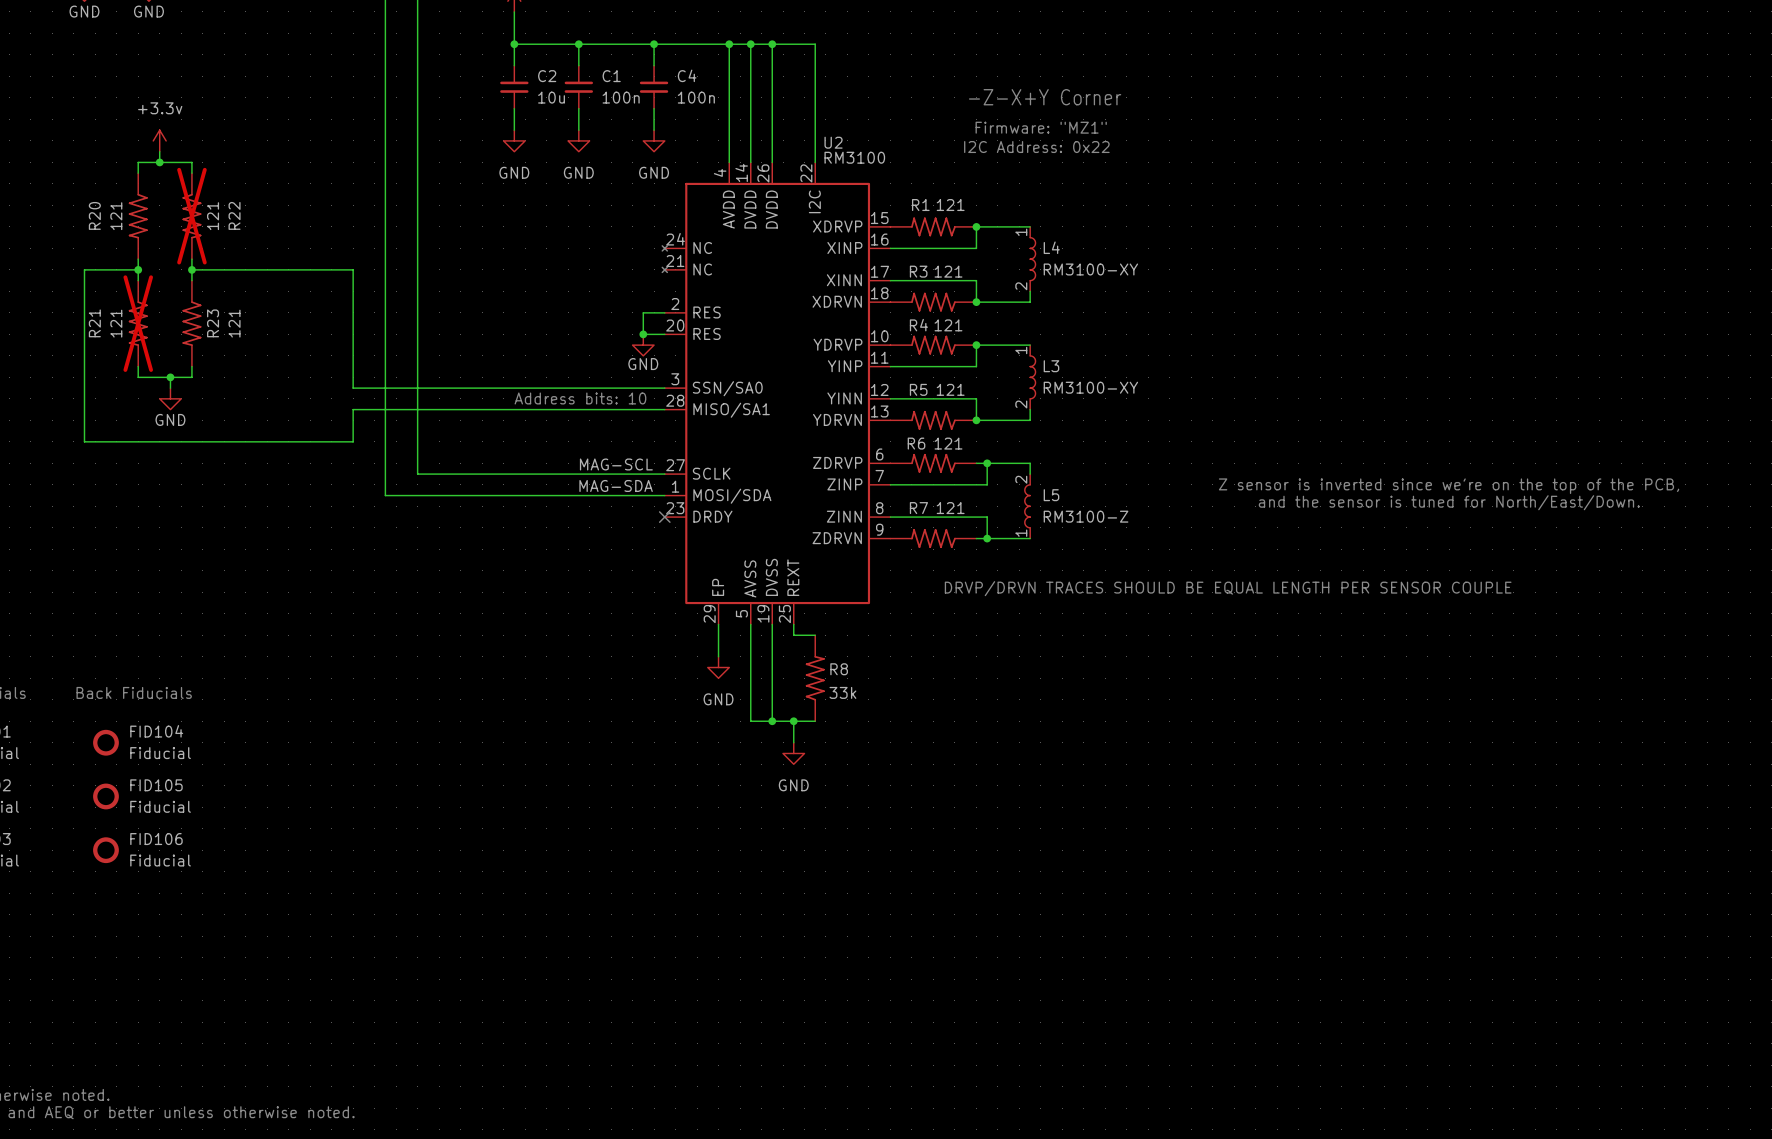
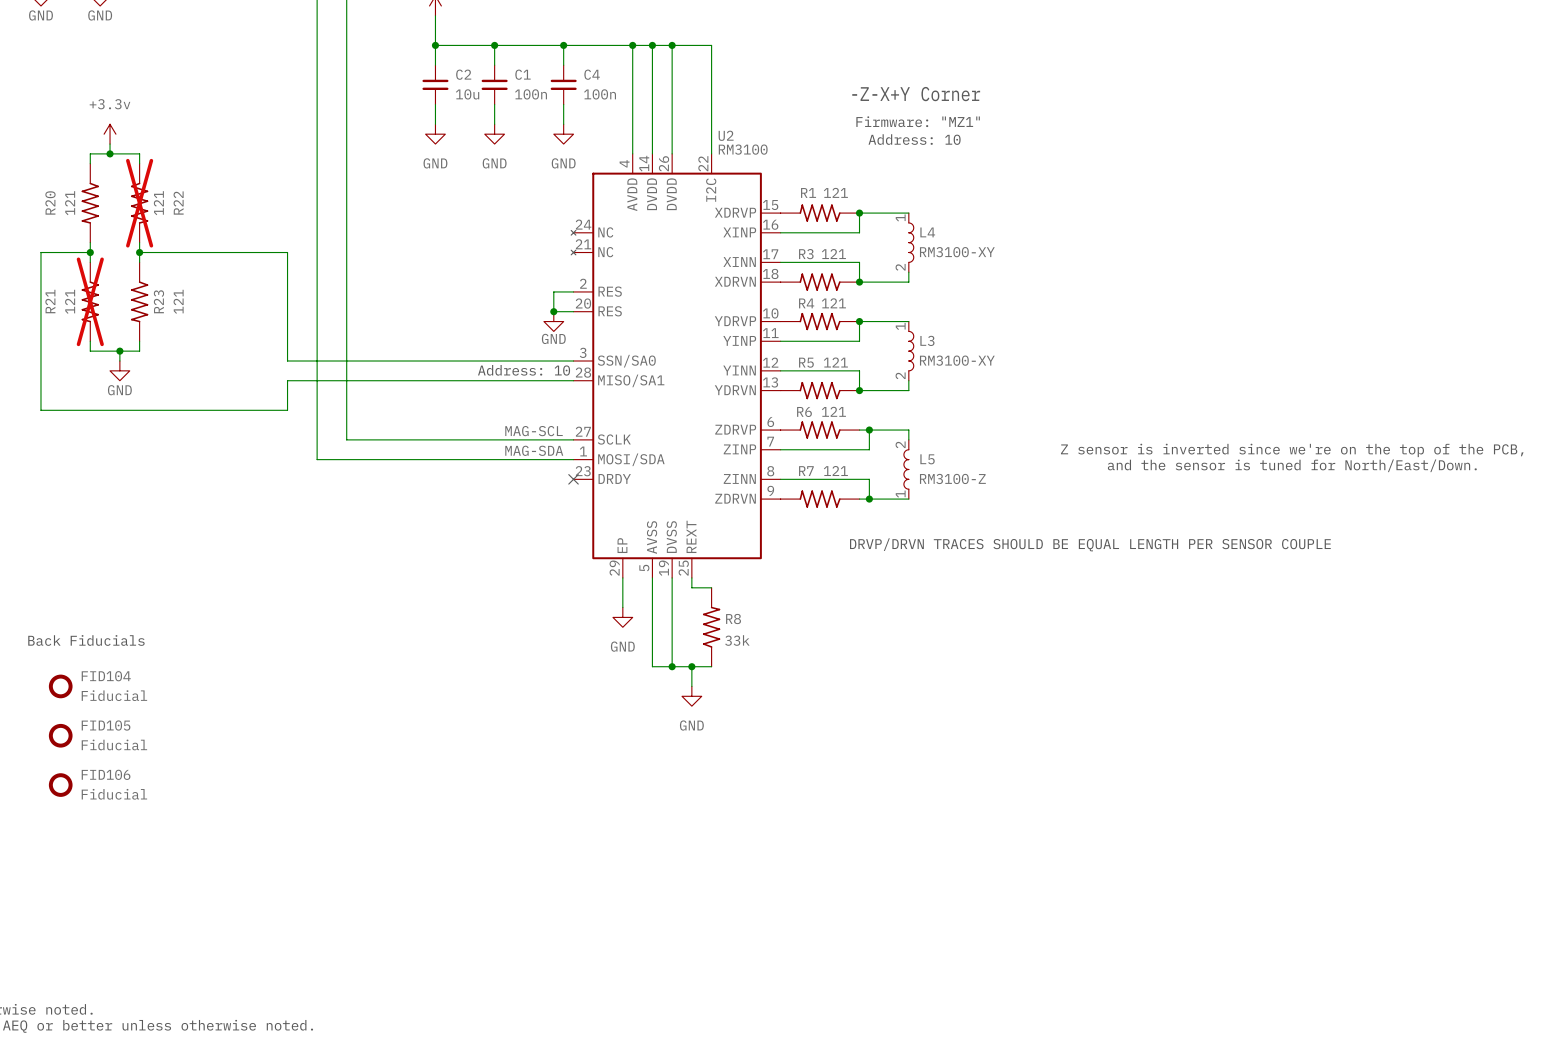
text: I2C Address: 0x22 (1036, 147) -> Address: 10 (914, 139)
text: Address bits: 10 (580, 398) -> Address: 10 (524, 370)

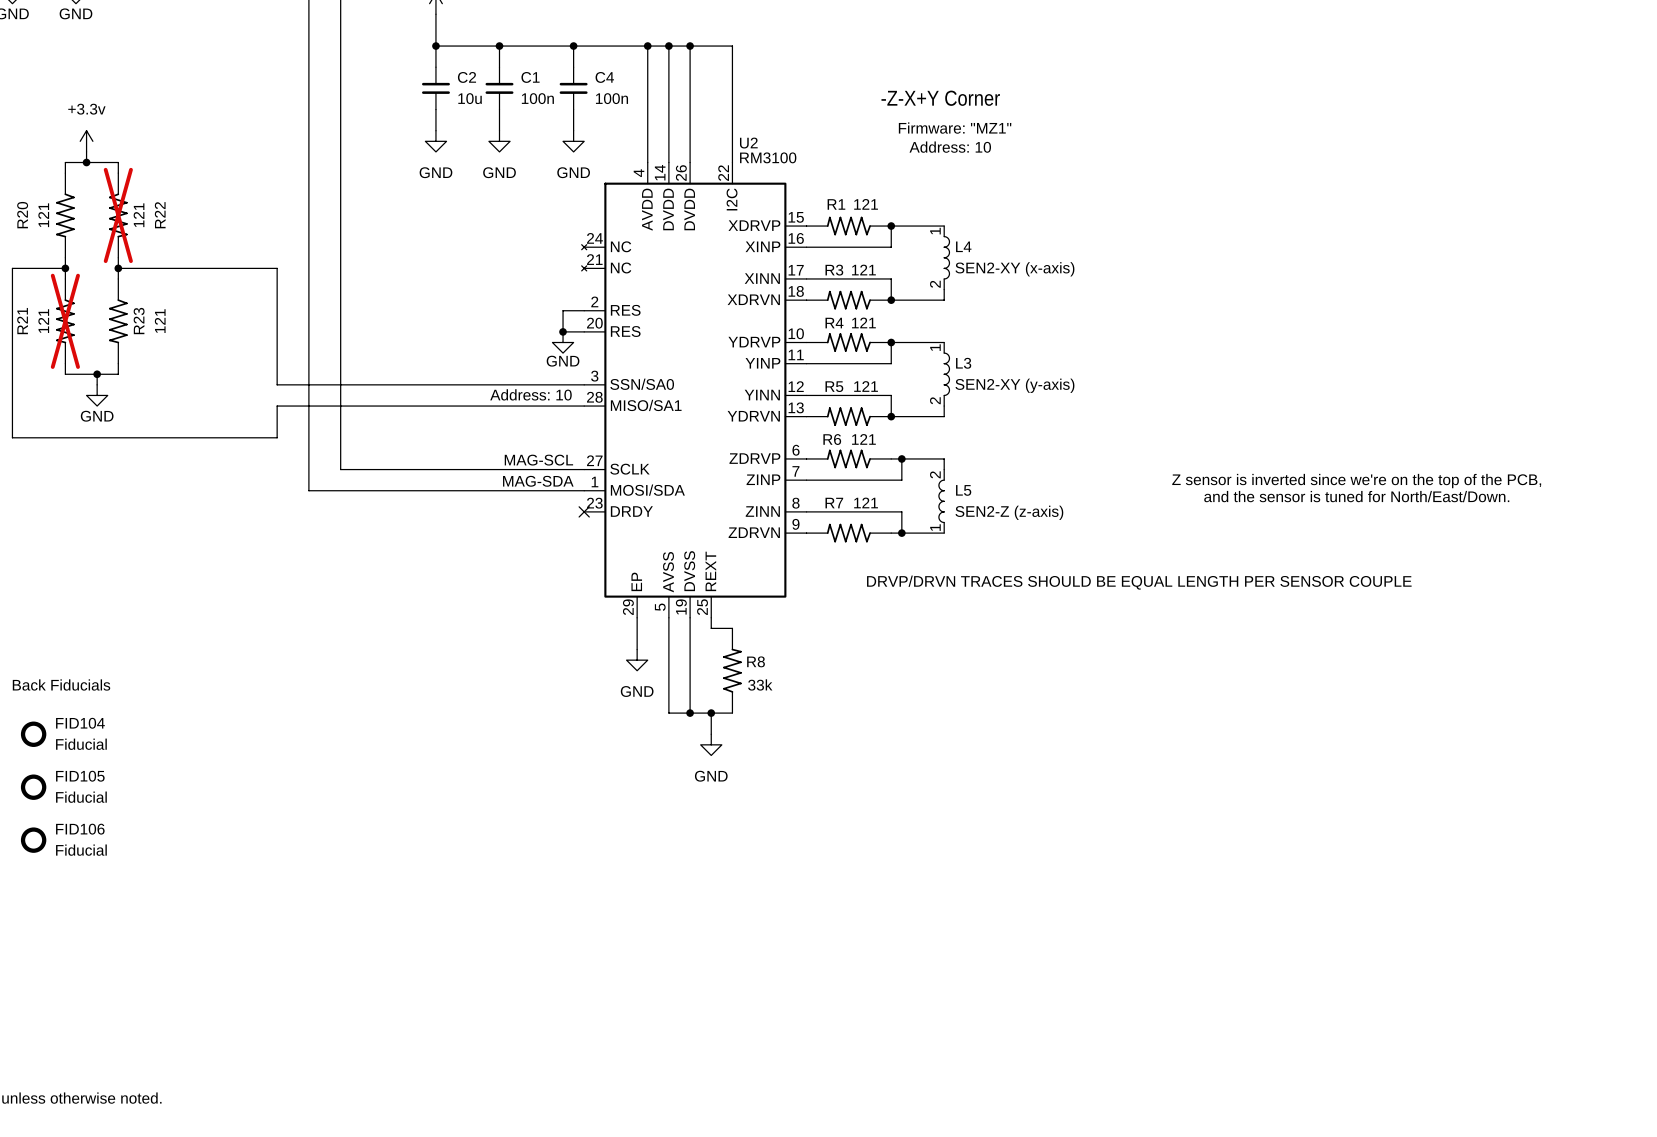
L4 value: RM3100-XY (957, 252) -> SEN2-XY (x-axis) (1014, 269)
L3 value: RM3100-XY (957, 360) -> SEN2-XY (y-axis) (1014, 385)
L5 value: RM3100-Z (952, 478) -> SEN2-Z (z-axis) (1009, 512)

